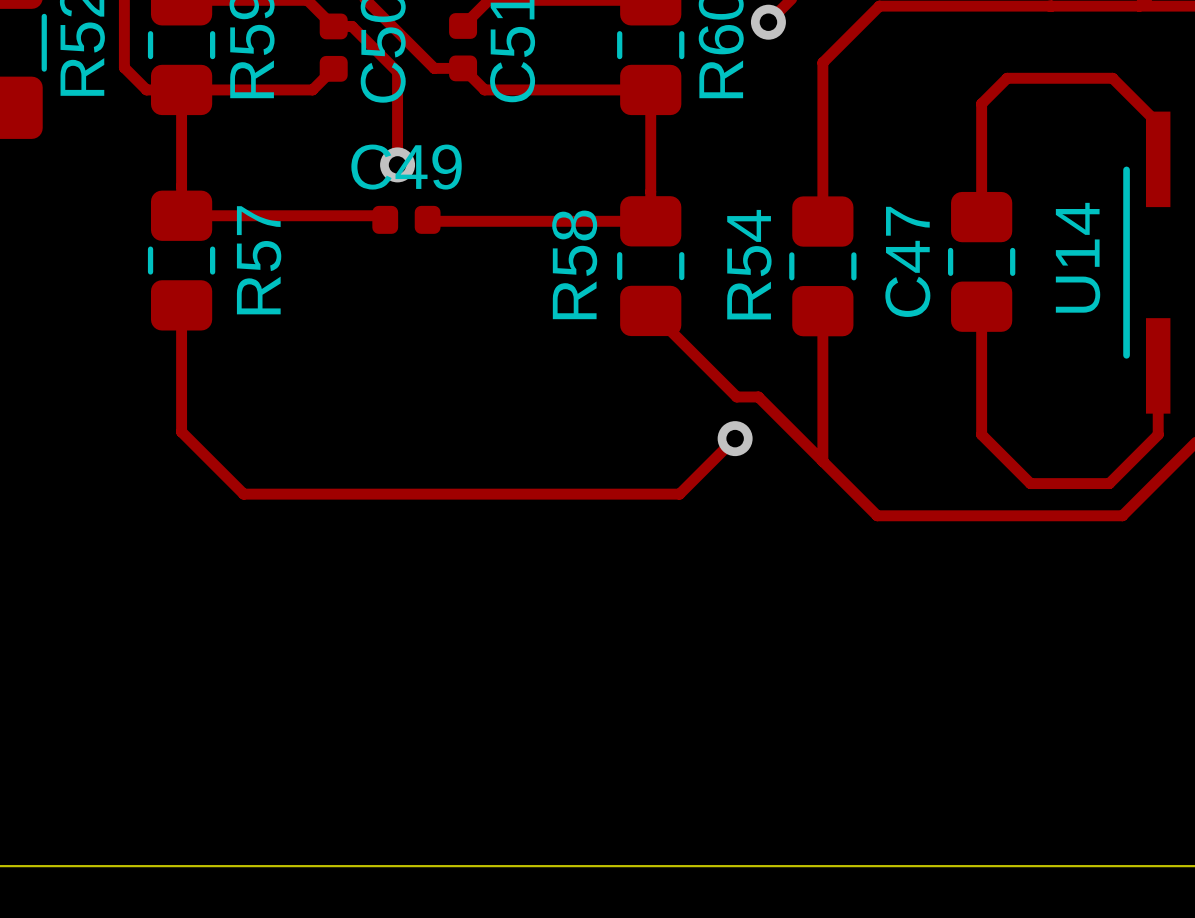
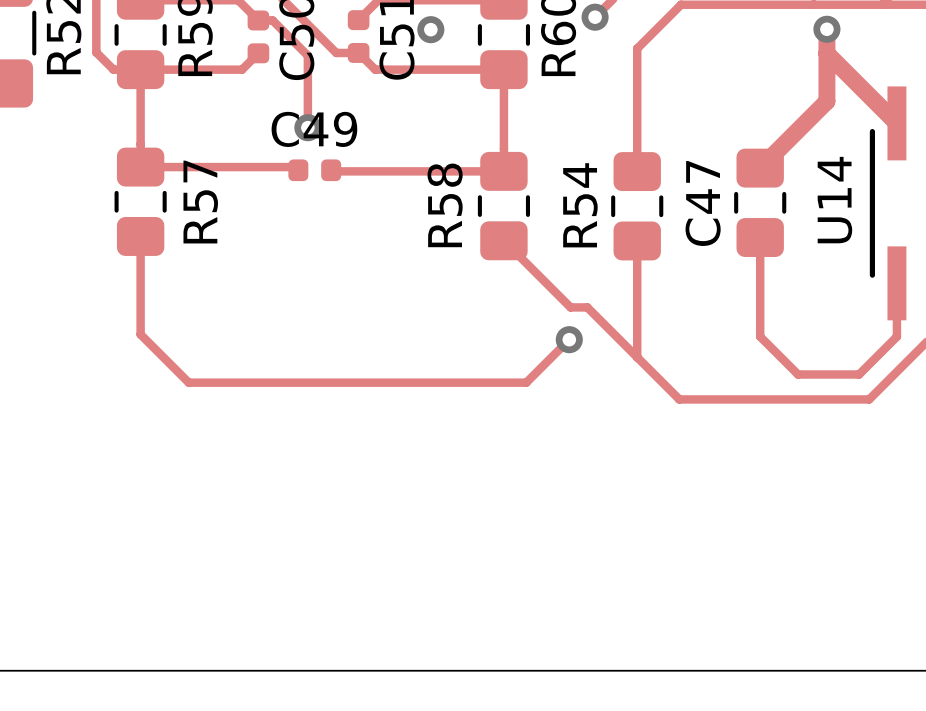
via: none -> (826, 29)
via: none -> (430, 29)
track: none -> (826, 53) (896, 123)
track: (1158, 123) (1112, 78) (1007, 78) (981, 103) (981, 217) -> (826, 29) (826, 101) (760, 168)

